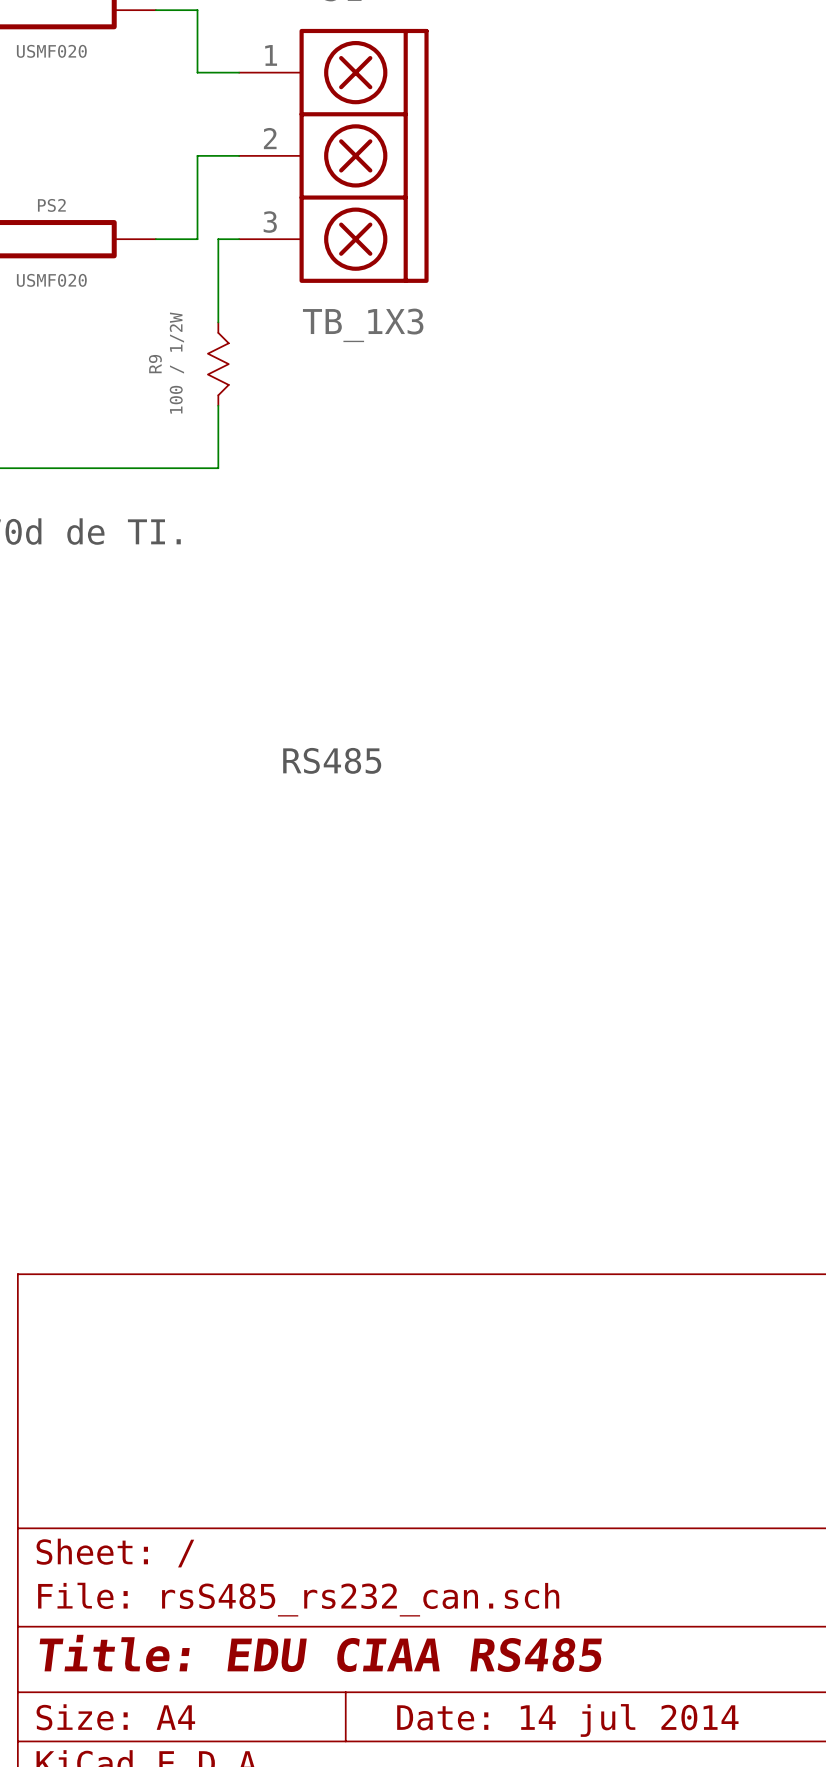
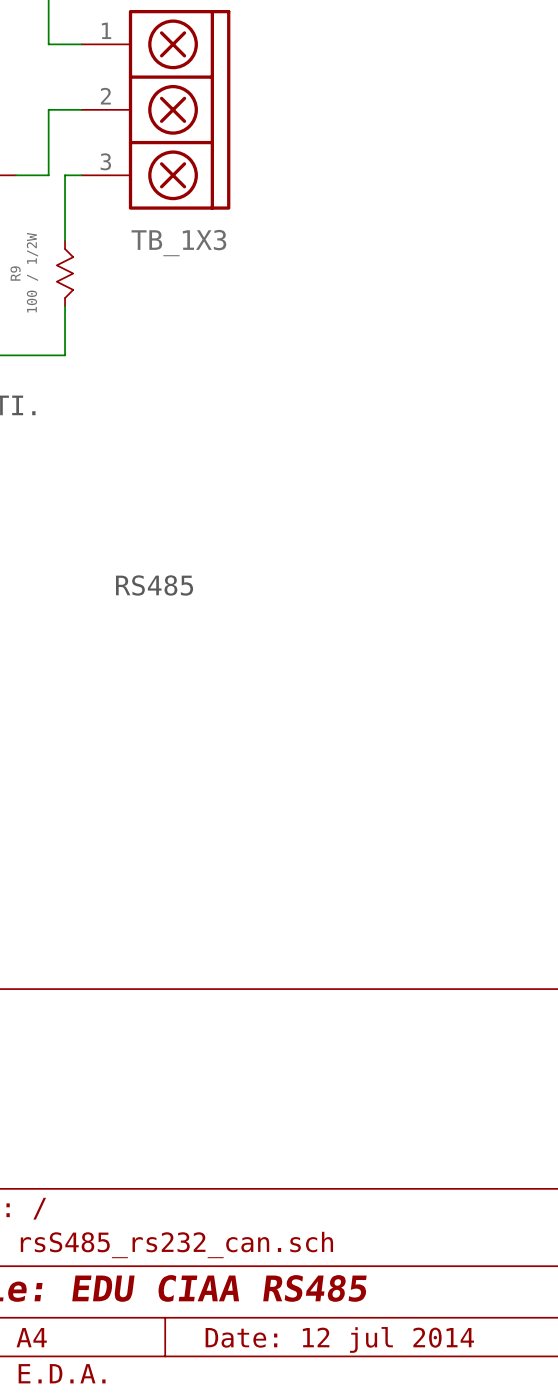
title block: Date: 14 jul 2014 (567, 1720) -> Date: 12 jul 2014 (339, 1339)

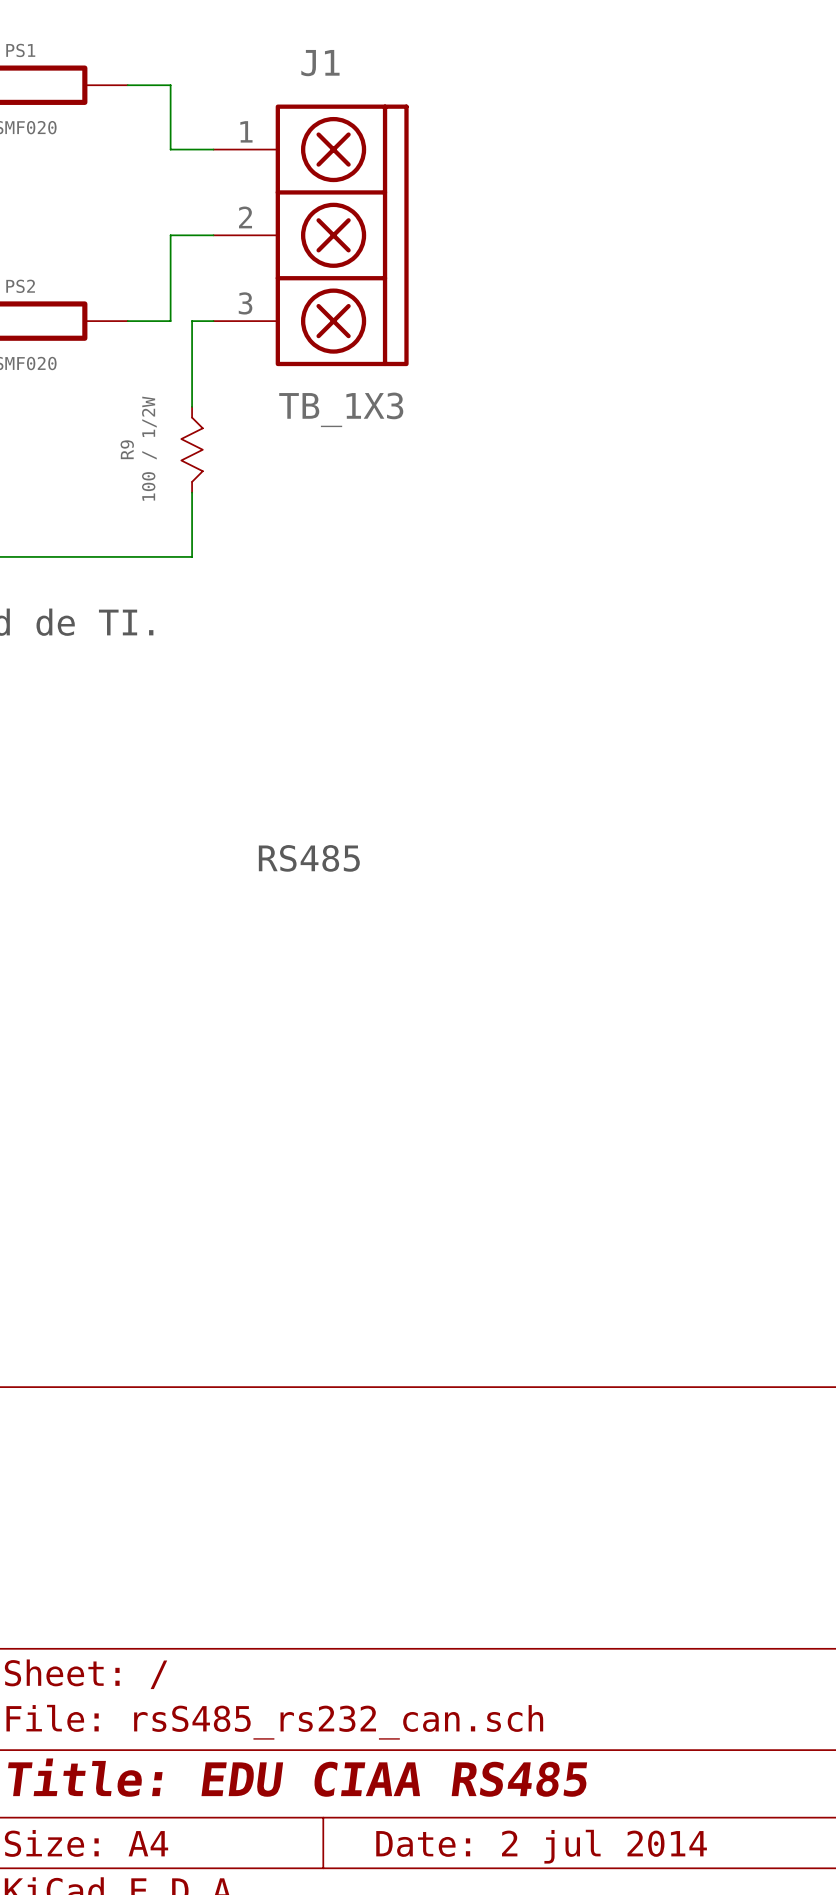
title block: Date: 12 jul 2014 (339, 1339) -> Date: 2 jul 2014 (541, 1846)

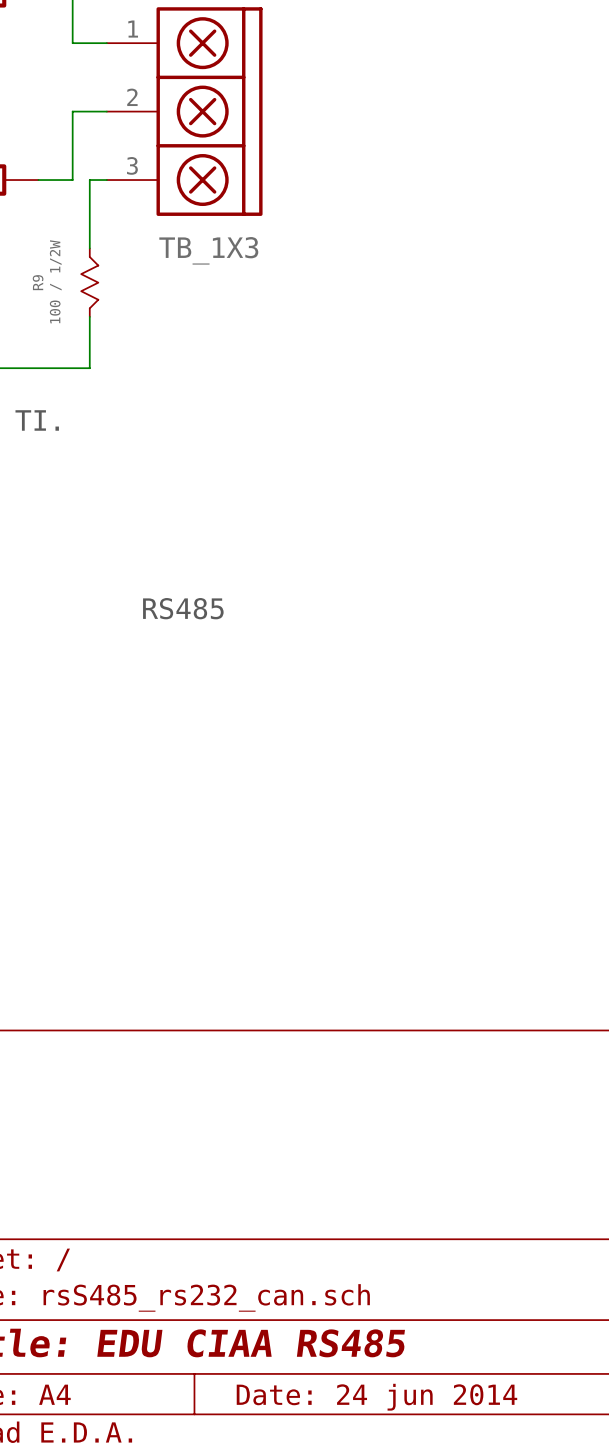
title block: Date: 2 jul 2014 (541, 1846) -> Date: 24 jun 2014 (376, 1397)

